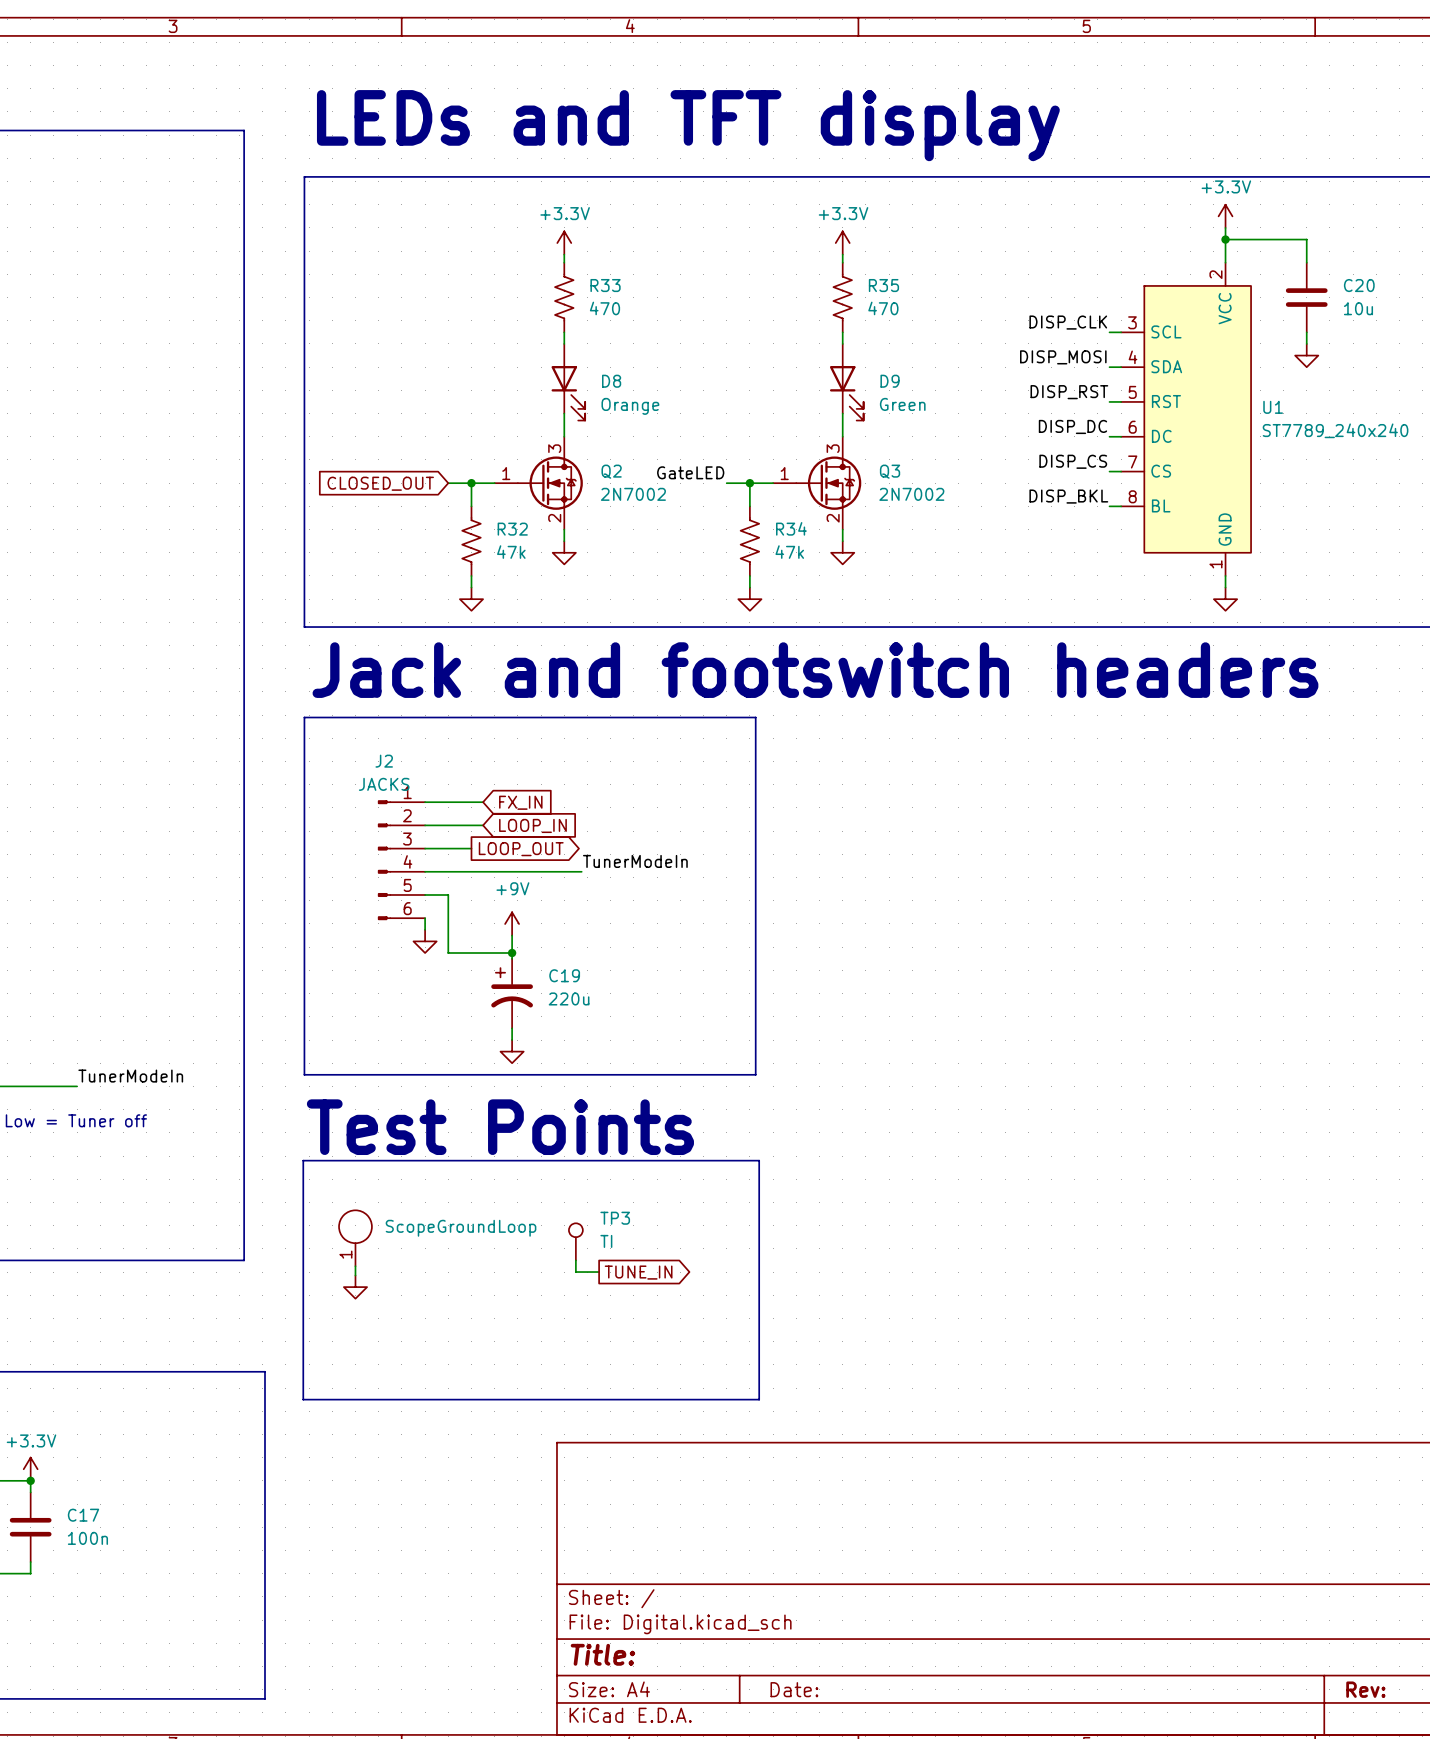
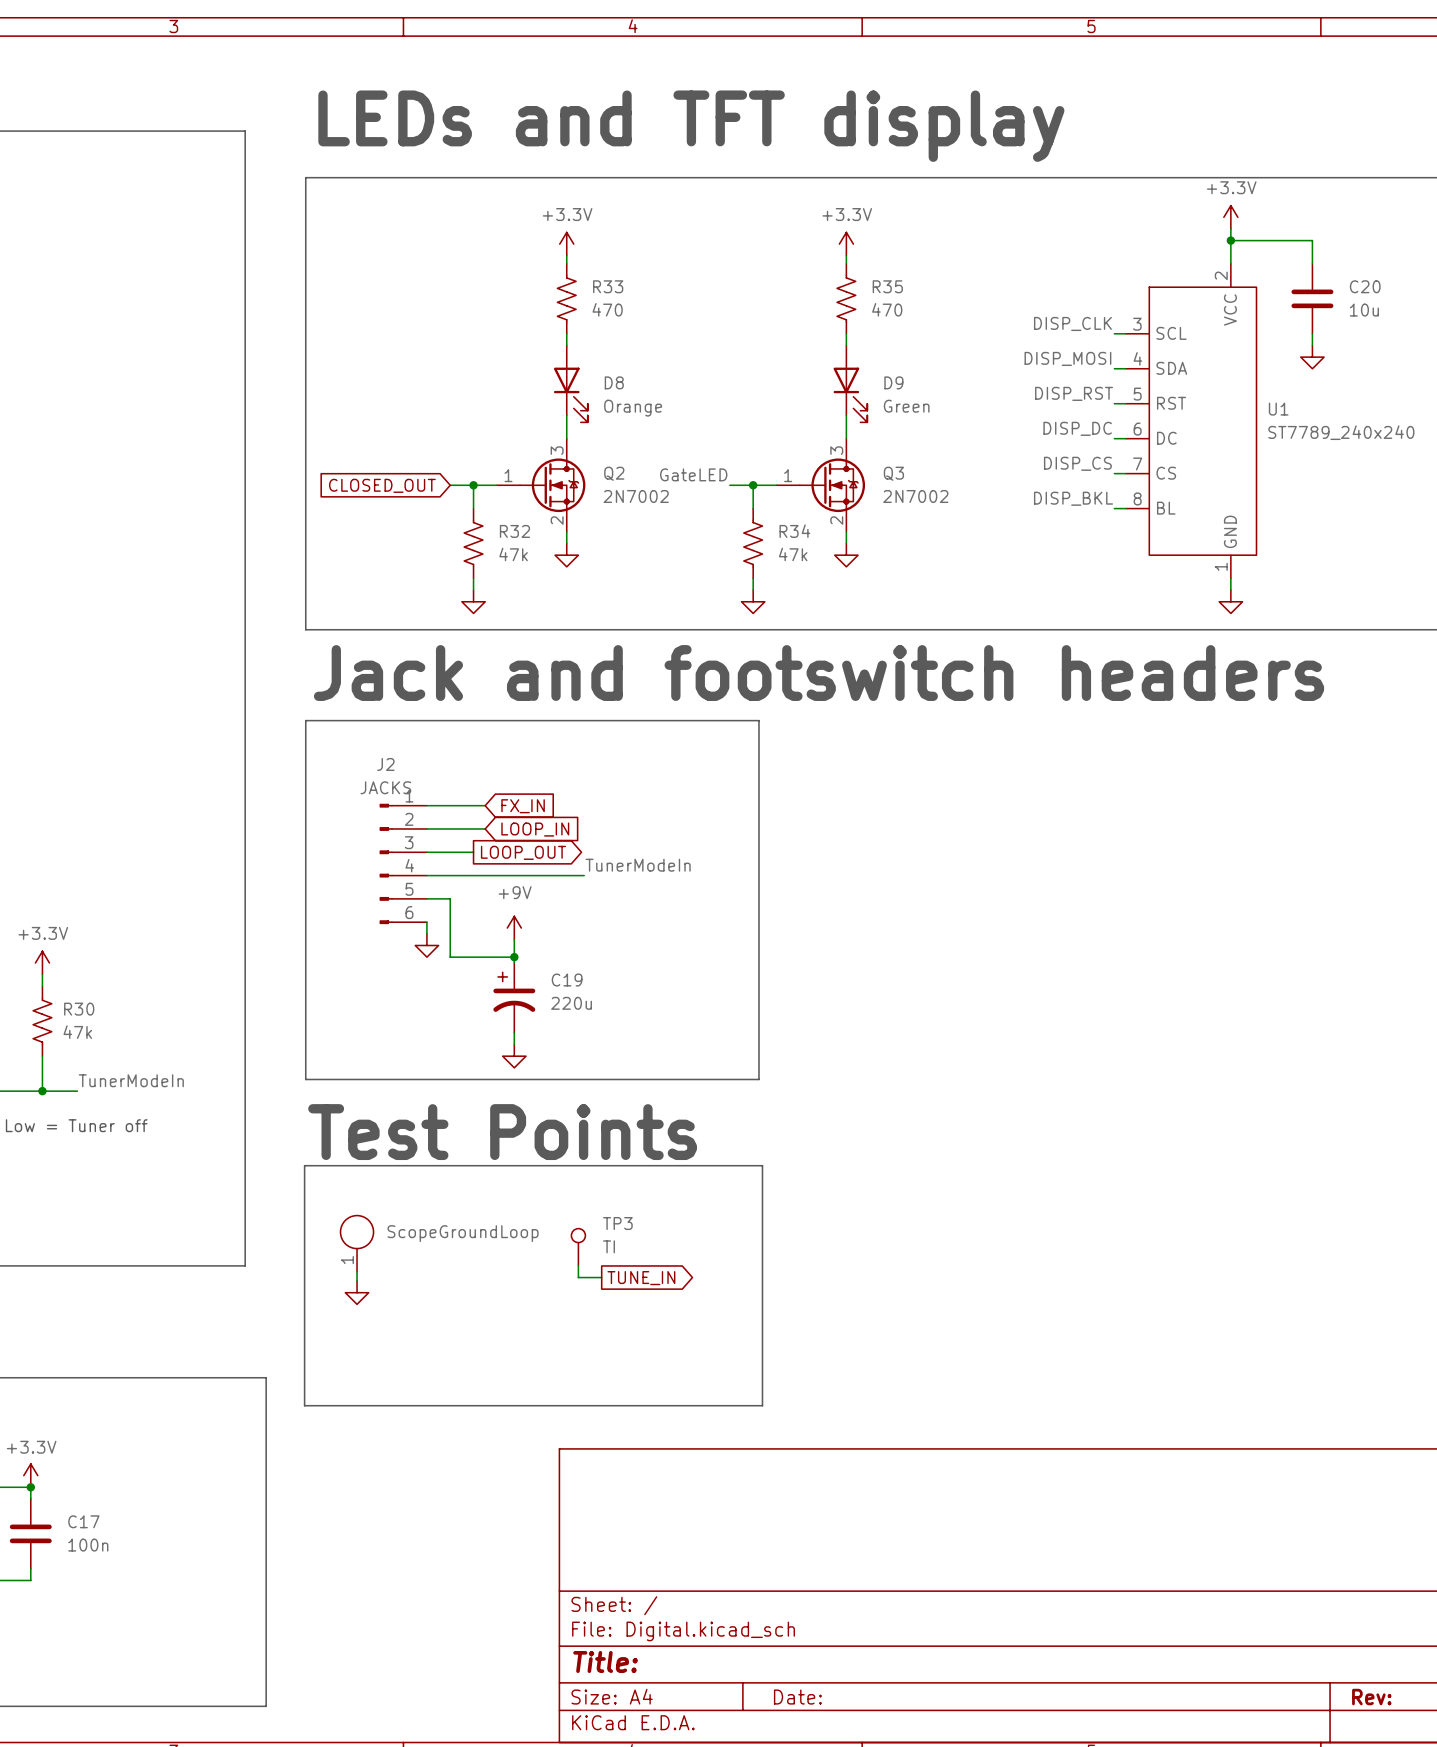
power symbol: none -> +3.3V (42, 962)
wire: none -> (42, 974) (42, 986)
R30: none -> 47k (42, 1021)
wire: none -> (42, 1056) (42, 1091)
junction: none -> (42, 1091)

